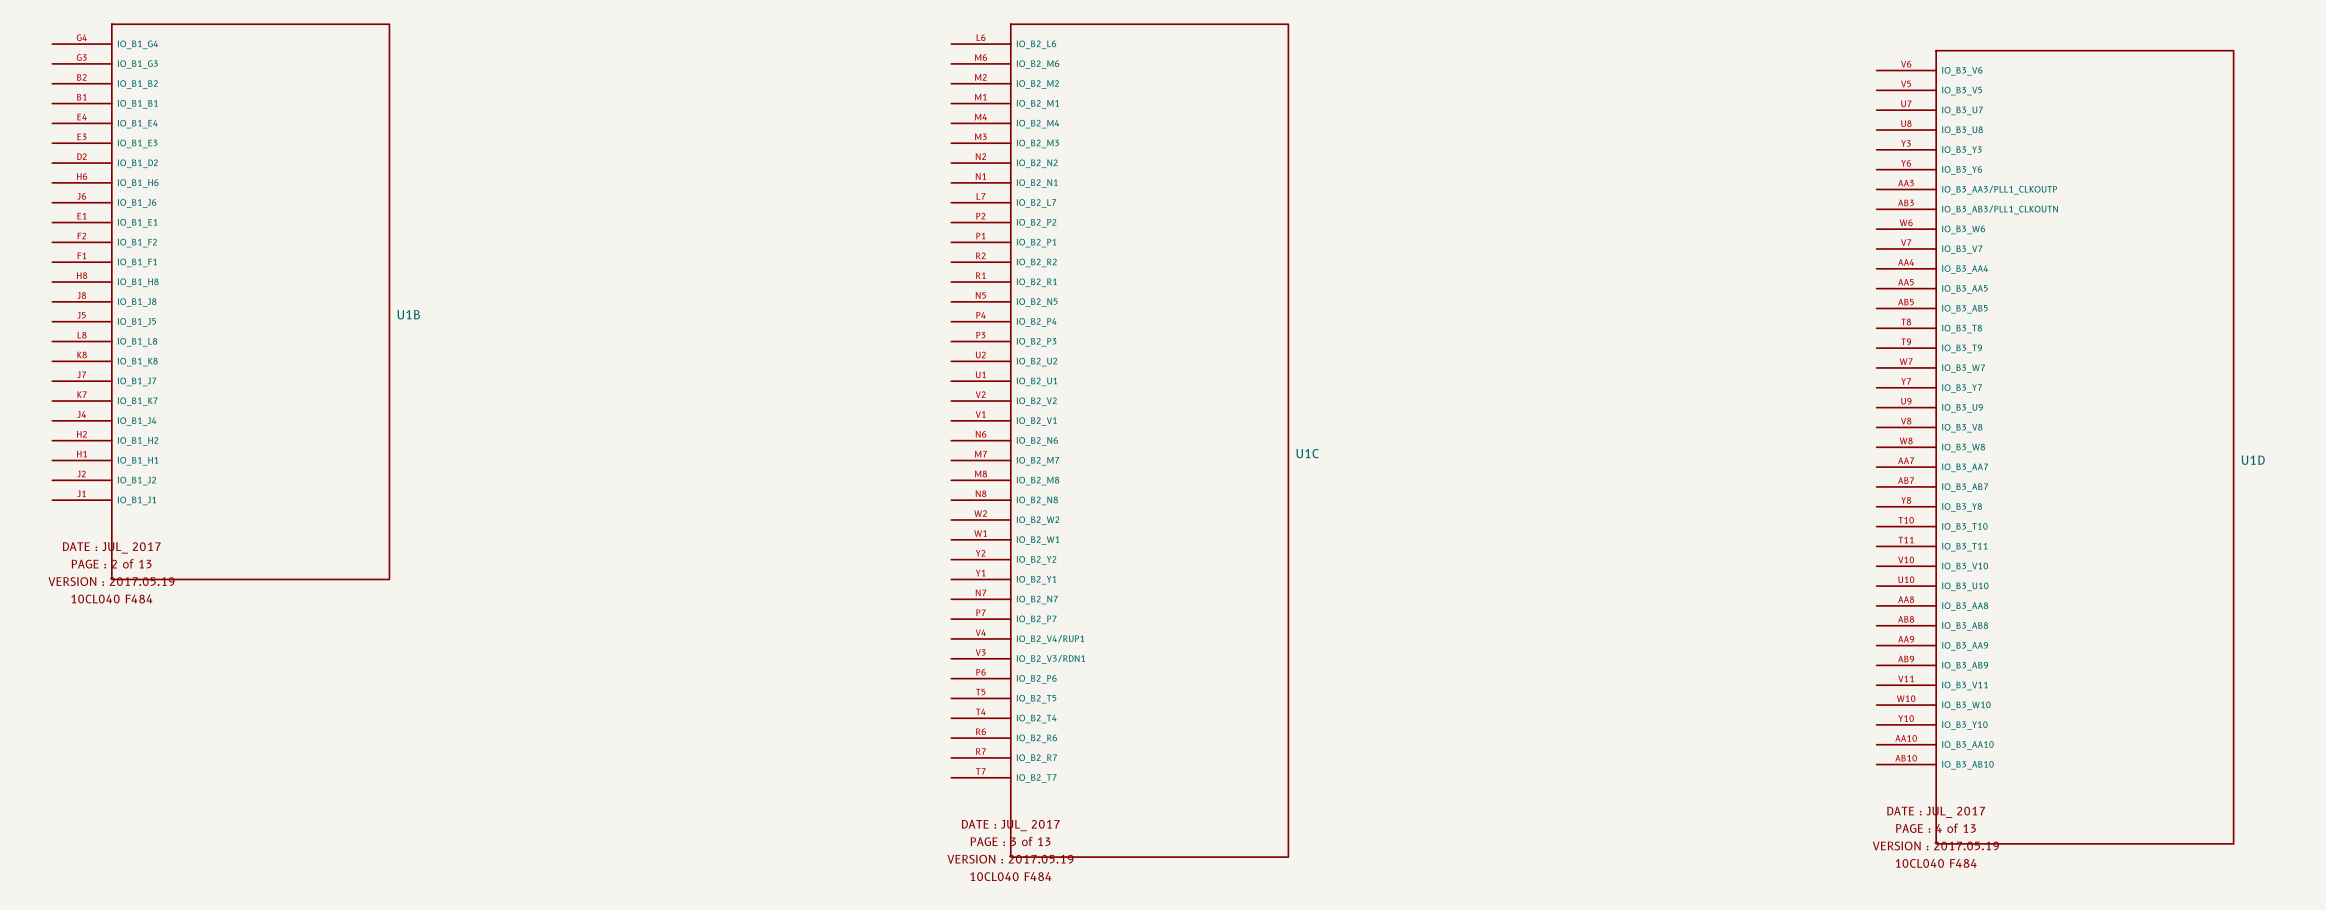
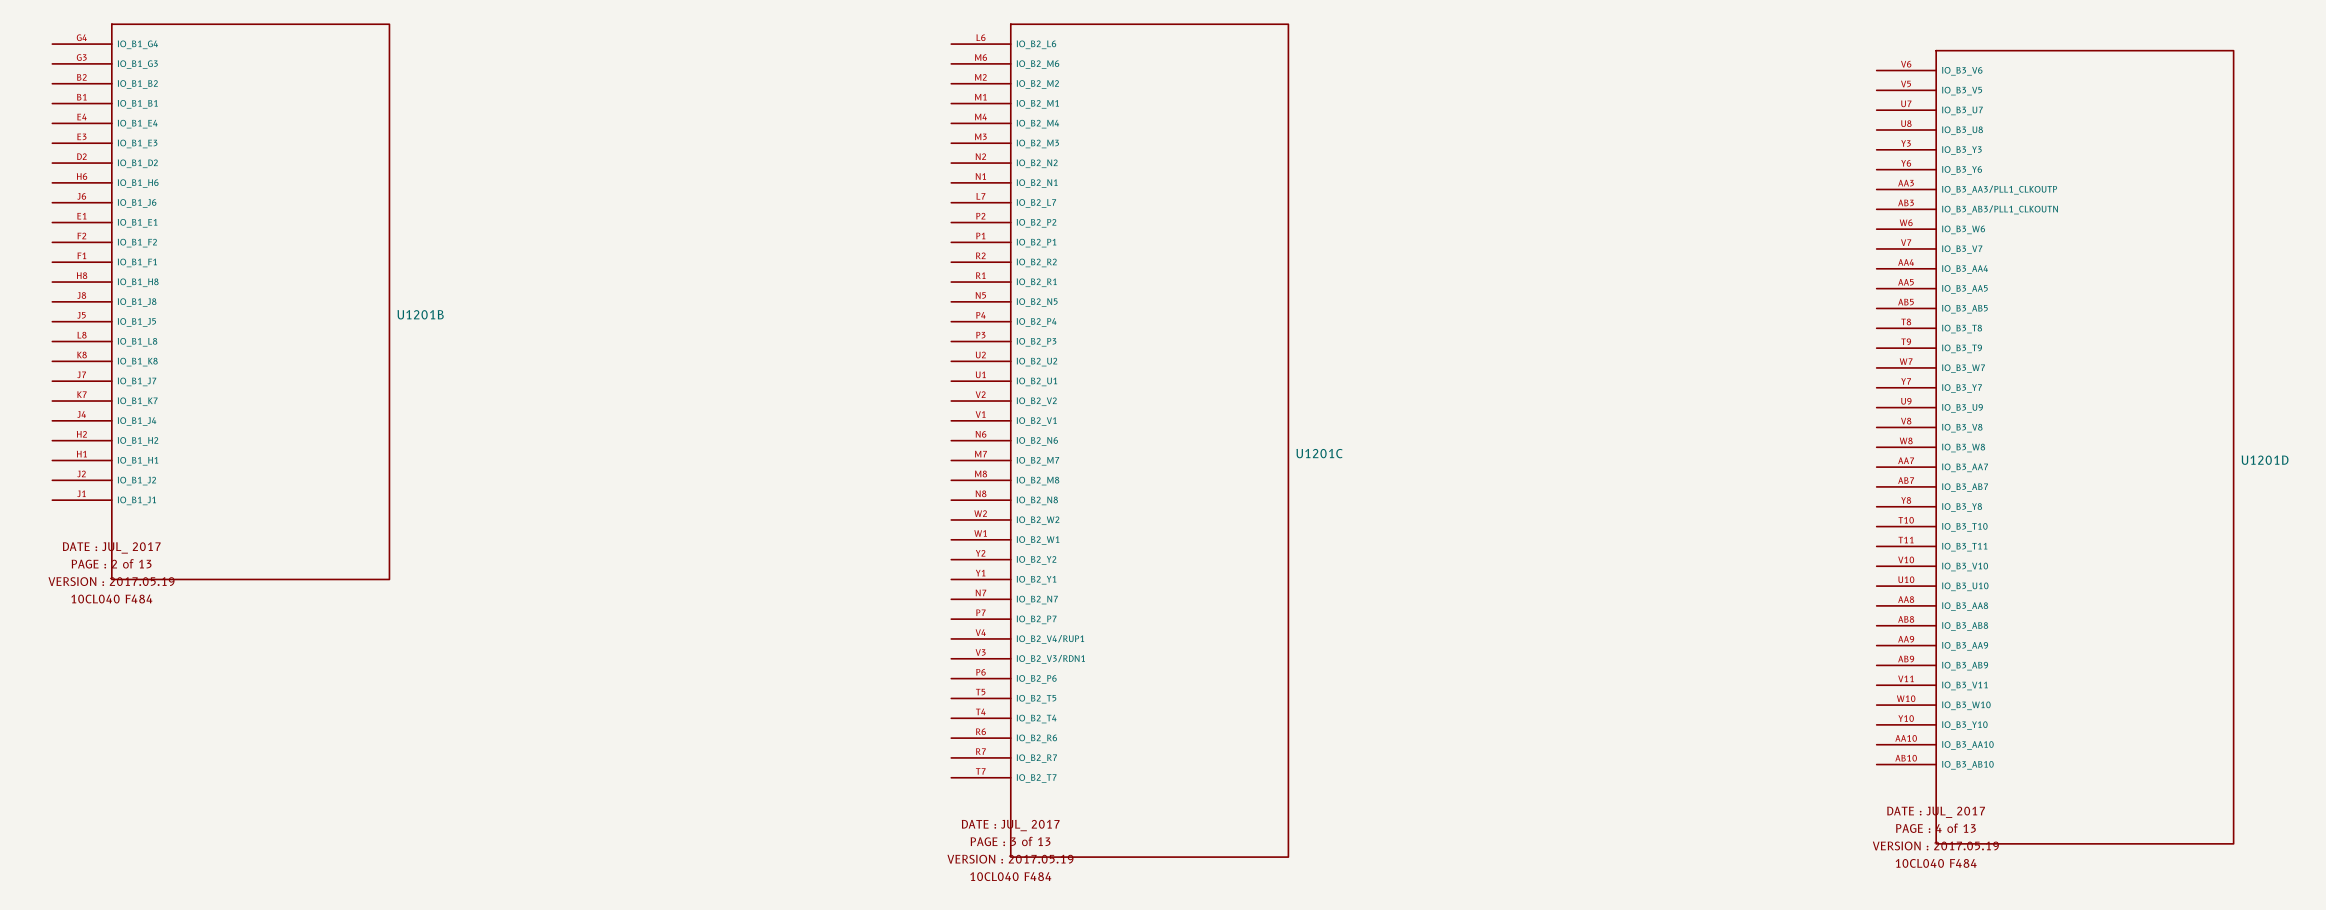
U1B name: U1B (408, 314) -> U1201B (420, 314)
U1C name: U1C (1307, 453) -> U1201C (1319, 453)
U1D name: U1D (2253, 460) -> U1201D (2265, 460)

